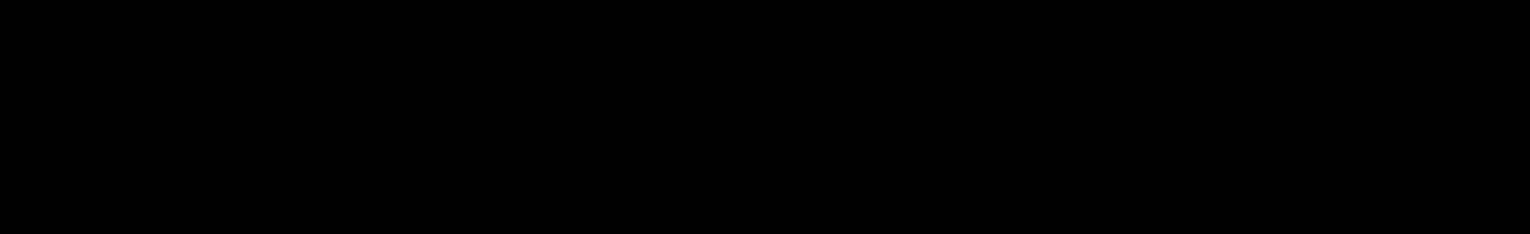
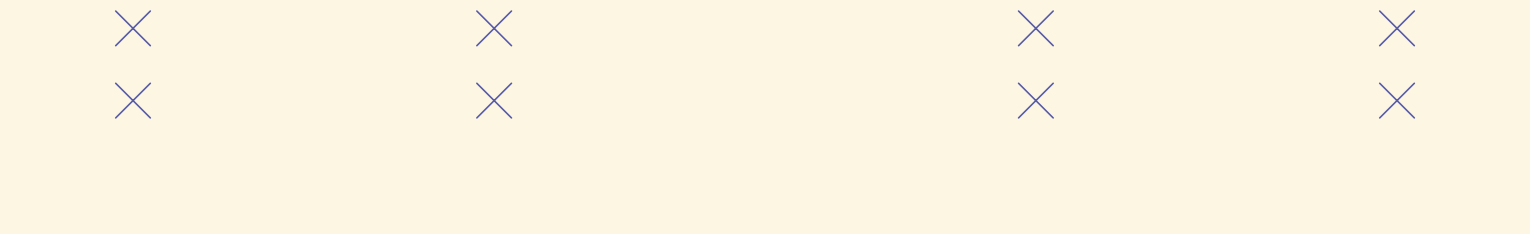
no-connect mark: none -> (133, 28)
no-connect mark: none -> (494, 28)
no-connect mark: none -> (1035, 28)
no-connect mark: none -> (1397, 28)
no-connect mark: none -> (133, 100)
no-connect mark: none -> (494, 100)
no-connect mark: none -> (1035, 100)
no-connect mark: none -> (1397, 100)

